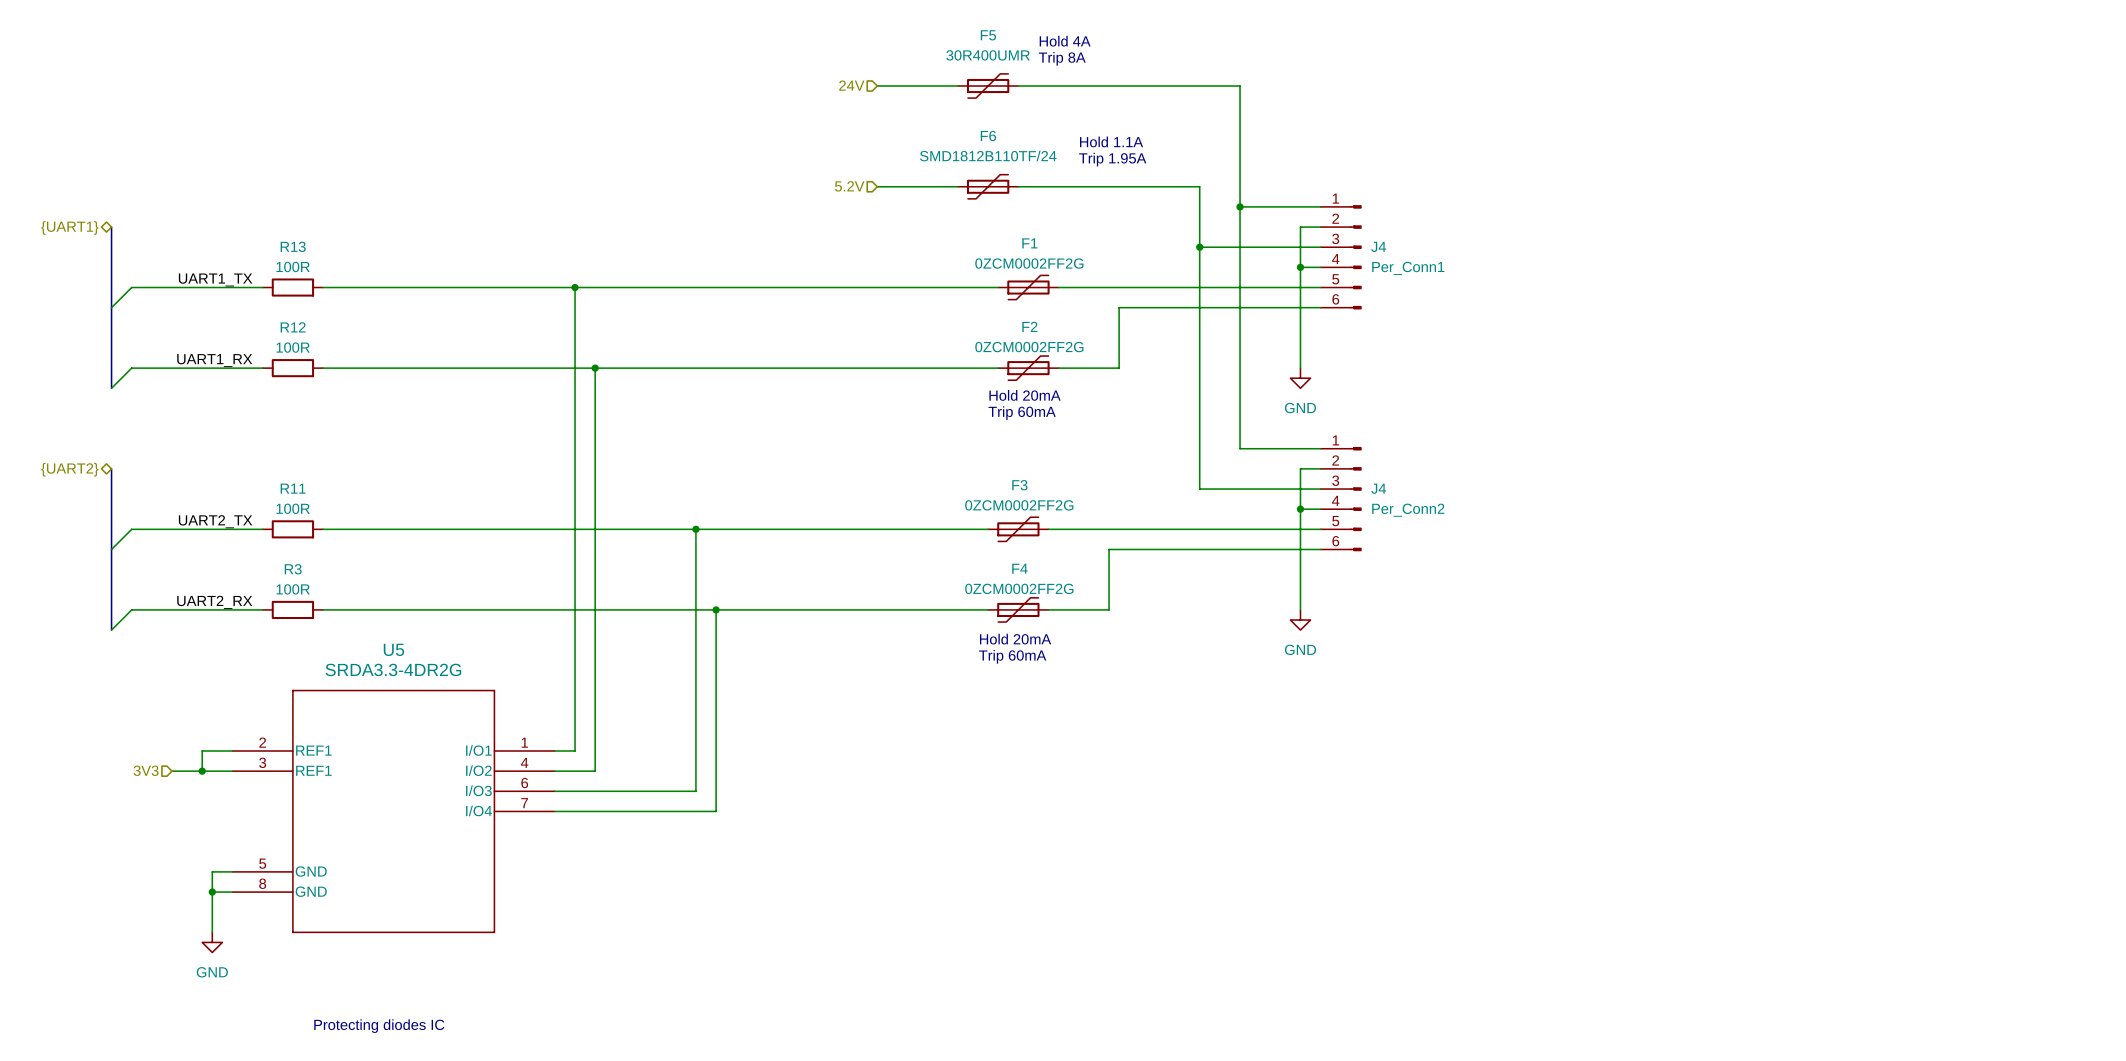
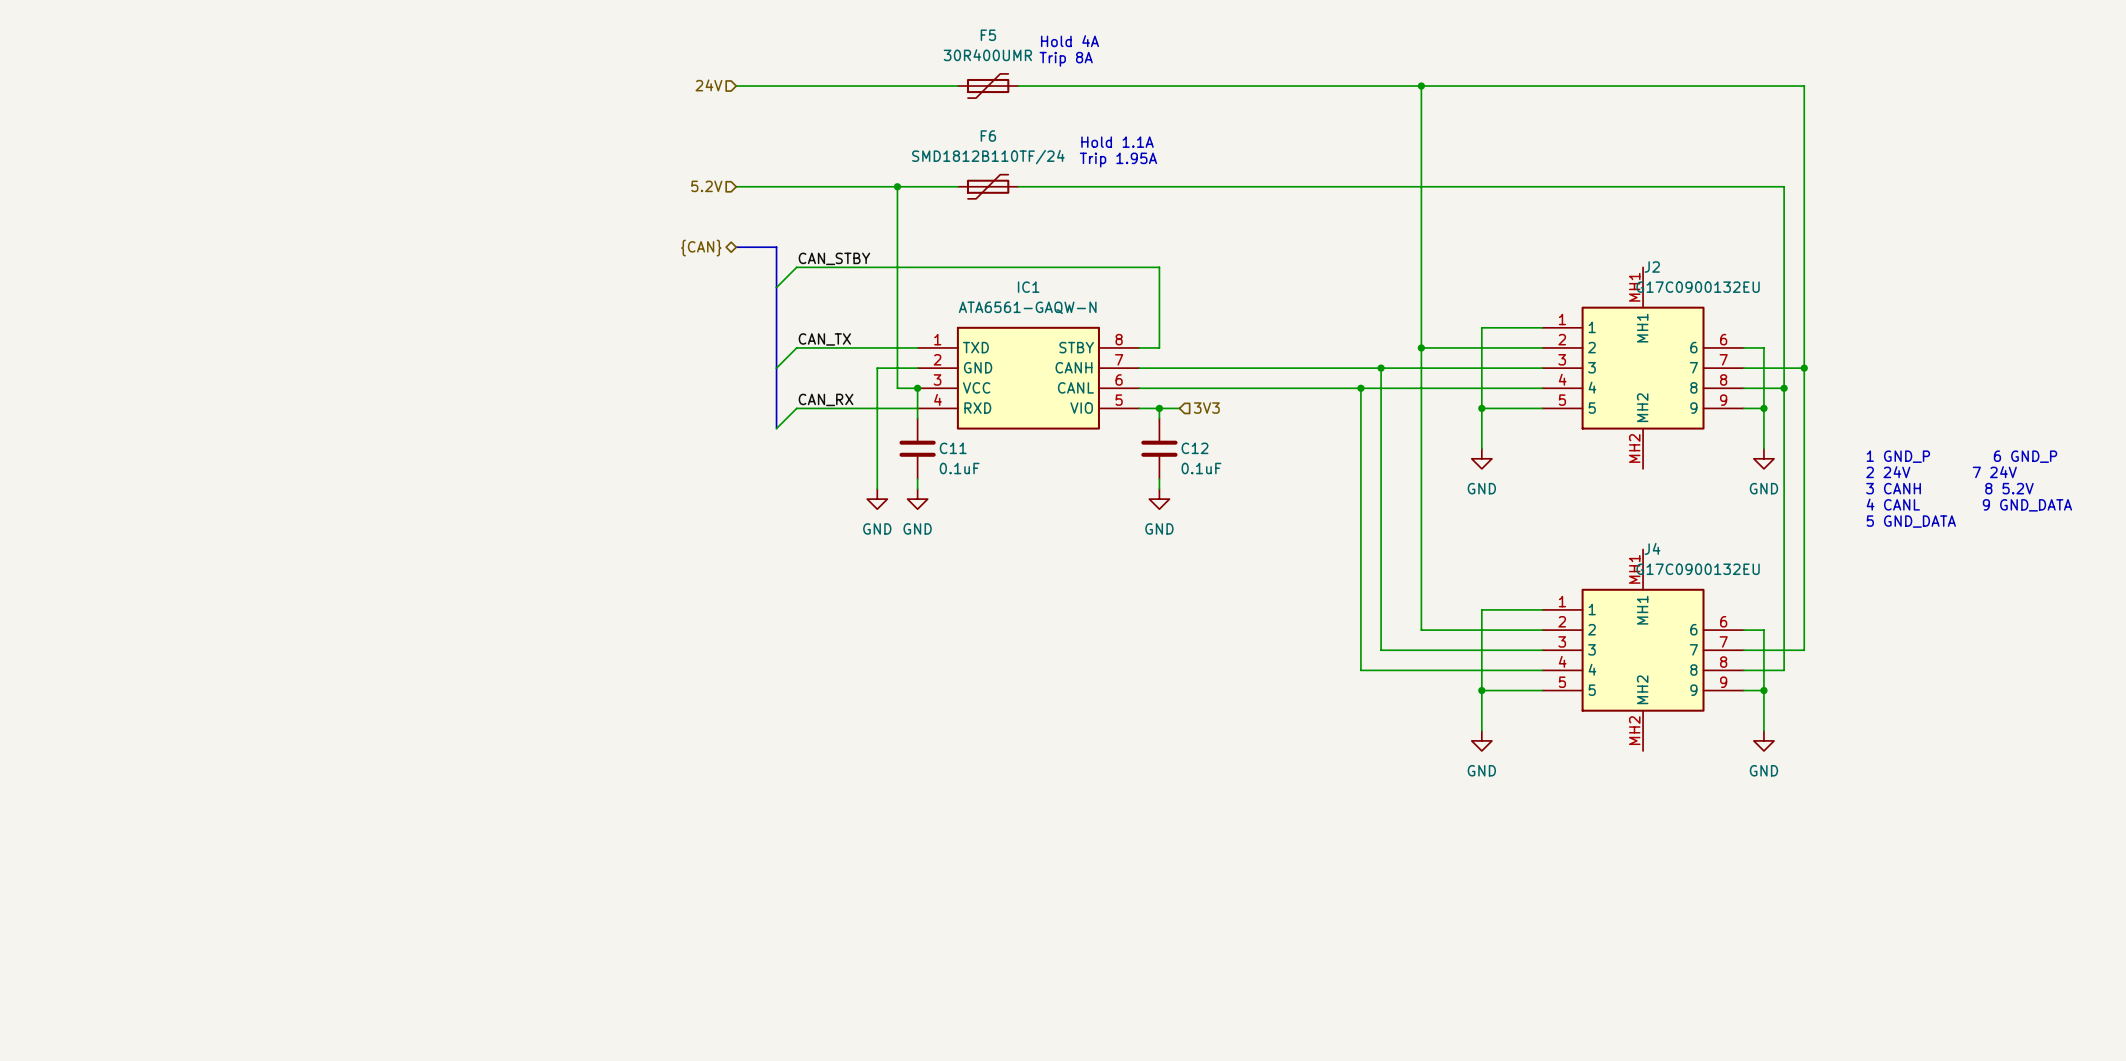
hierarchical label position: 24V (851, 85) -> 24V (708, 85)
wire: none -> (736, 86) (877, 86)
wire: (1240, 86) (1240, 448) (1320, 448) -> (1240, 86) (1804, 86) (1804, 650) (1743, 650)
wire: none -> (1421, 86) (1421, 630) (1542, 630)
junction: none -> (1421, 86)
wire: none -> (736, 186) (877, 186)
hierarchical label position: 5.2V (849, 186) -> 5.2V (706, 186)
wire: none -> (897, 186) (897, 388) (917, 388) (917, 418)
junction: none -> (897, 186)
wire: (1199, 186) (1199, 489) (1320, 489) -> (1199, 186) (1784, 186) (1784, 670) (1743, 670)
wire: (1240, 206) (1320, 206) -> none
junction: (1240, 206) -> none
hierarchical label: {UART1} (69, 227) -> none
bus: (111, 227) (111, 388) -> none
wire: (1320, 227) (1300, 227) (1300, 368) -> none
bus: none -> (736, 247) (776, 247) (776, 428)
wire: (1199, 247) (1320, 247) -> none
junction: (1199, 247) -> none
hierarchical label: none -> {CAN} (701, 248)
J4: Per_Conn1 (1341, 257) -> none
label: none -> CAN_STBY (834, 258)
wire: (1300, 267) (1320, 267) -> none
junction: (1300, 267) -> none
label: UART1_TX (215, 279) -> none
wire: (262, 287) (131, 287) (111, 307) -> none
R13: 100R (292, 287) -> none
wire: (323, 287) (998, 287) -> none
wire: (575, 287) (575, 751) (554, 751) -> none
junction: (575, 287) -> none
wire: none -> (776, 287) (796, 267) (1159, 267) (1159, 347) (1139, 347)
F1: 0ZCM0002FF2G (1028, 287) -> none
wire: (1058, 287) (1320, 287) -> none
wire: (1320, 307) (1119, 307) (1119, 368) (1058, 368) -> none
wire: none -> (1542, 327) (1481, 327) (1481, 448)
label: none -> CAN_TX (824, 339)
wire: none -> (917, 347) (796, 347) (776, 368)
wire: none -> (1421, 347) (1542, 347)
junction: none -> (1421, 347)
wire: none -> (1743, 347) (1763, 347) (1763, 448)
label: UART1_RX (214, 360) -> none
wire: (262, 368) (131, 368) (111, 388) -> none
R12: 100R (292, 368) -> none
wire: (323, 368) (877, 368) -> (877, 489) (877, 368)
wire: (595, 368) (595, 771) (554, 771) -> none
junction: (595, 368) -> none
F2: 0ZCM0002FF2G (1028, 368) -> none
wire: none -> (1139, 368) (1542, 368)
wire: none -> (1381, 368) (1381, 650) (1542, 650)
junction: none -> (1381, 368)
J2: none -> G17C0900132EU (1643, 368)
wire: none -> (1743, 368) (1804, 368)
junction: none -> (1804, 368)
IC1: none -> ATA6561-GAQW-N (1028, 378)
power symbol: GND (1300, 378) -> none
junction: none -> (917, 388)
wire: none -> (1139, 388) (1542, 388)
wire: none -> (1360, 388) (1360, 670) (1542, 670)
junction: none -> (1360, 388)
wire: none -> (1743, 388) (1784, 388)
junction: none -> (1784, 388)
text: Hold 20mA (1025, 395) -> none
label: none -> CAN_RX (826, 399)
wire: none -> (917, 408) (796, 408) (776, 428)
wire: none -> (1139, 408) (1179, 408)
wire: none -> (1159, 408) (1159, 418)
junction: none -> (1159, 408)
hierarchical label: none -> 3V3 (1206, 408)
wire: none -> (1481, 408) (1542, 408)
junction: none -> (1481, 408)
wire: none -> (1743, 408) (1763, 408)
junction: none -> (1763, 408)
text: Trip 60mA (1022, 413) -> none
C11: none -> 0.1uF (917, 448)
C12: none -> 0.1uF (1159, 448)
text: none -> 1 GND_P 6 GND_P (1961, 456)
power symbol: none -> GND (1481, 458)
power symbol: none -> GND (1763, 458)
bus: (111, 468) (111, 630) -> none
wire: (1320, 468) (1300, 468) (1300, 609) -> none
hierarchical label: {UART2} (69, 469) -> none
text: none -> 2 24V 7 24V (1941, 472)
wire: none -> (917, 478) (917, 489)
wire: none -> (1159, 478) (1159, 489)
text: none -> 3 CANH 8 5.2V (1949, 488)
power symbol: none -> GND (877, 499)
power symbol: none -> GND (917, 499)
power symbol: none -> GND (1159, 499)
J4: Per_Conn2 (1341, 499) -> none
text: none -> 4 CANL 9 GND_DATA (1969, 505)
wire: (1300, 509) (1320, 509) -> none
junction: (1300, 509) -> none
label: UART2_TX (215, 521) -> none
text: none -> 5 GND_DATA (1911, 521)
wire: (262, 529) (131, 529) (111, 549) -> none
R11: 100R (292, 529) -> none
wire: (323, 529) (988, 529) -> none
wire: (695, 529) (695, 791) (554, 791) -> none
junction: (695, 529) -> none
F3: 0ZCM0002FF2G (1018, 529) -> none
wire: (1048, 529) (1320, 529) -> none
wire: (1320, 549) (1109, 549) (1109, 609) (1048, 609) -> none
label: UART2_RX (214, 602) -> none
wire: (262, 609) (131, 609) (111, 630) -> none
R3: 100R (292, 609) -> none
wire: (323, 609) (988, 609) -> none
wire: (716, 609) (716, 811) (554, 811) -> none
junction: (716, 609) -> none
F4: 0ZCM0002FF2G (1018, 609) -> none
wire: none -> (1542, 609) (1481, 609) (1481, 730)
power symbol: GND (1300, 620) -> none
wire: none -> (1743, 630) (1763, 630) (1763, 730)
text: Hold 20mA (1015, 639) -> none
J4: none -> G17C0900132EU (1643, 650)
text: Trip 60mA (1012, 656) -> none
wire: none -> (1481, 690) (1542, 690)
junction: none -> (1481, 690)
wire: none -> (1743, 690) (1763, 690)
junction: none -> (1763, 690)
power symbol: none -> GND (1481, 740)
power symbol: none -> GND (1763, 740)
wire: (232, 751) (202, 751) (202, 771) -> none
hierarchical label: 3V3 (146, 770) -> none
wire: (172, 771) (232, 771) -> none
junction: (202, 771) -> none
U5: SRDA3.3-4DR2G (393, 811) -> none
wire: (232, 871) (212, 871) (212, 932) -> none
wire: (212, 892) (232, 892) -> none
junction: (212, 892) -> none
power symbol: GND (212, 942) -> none
text: Protecting diodes IC (379, 1026) -> none

